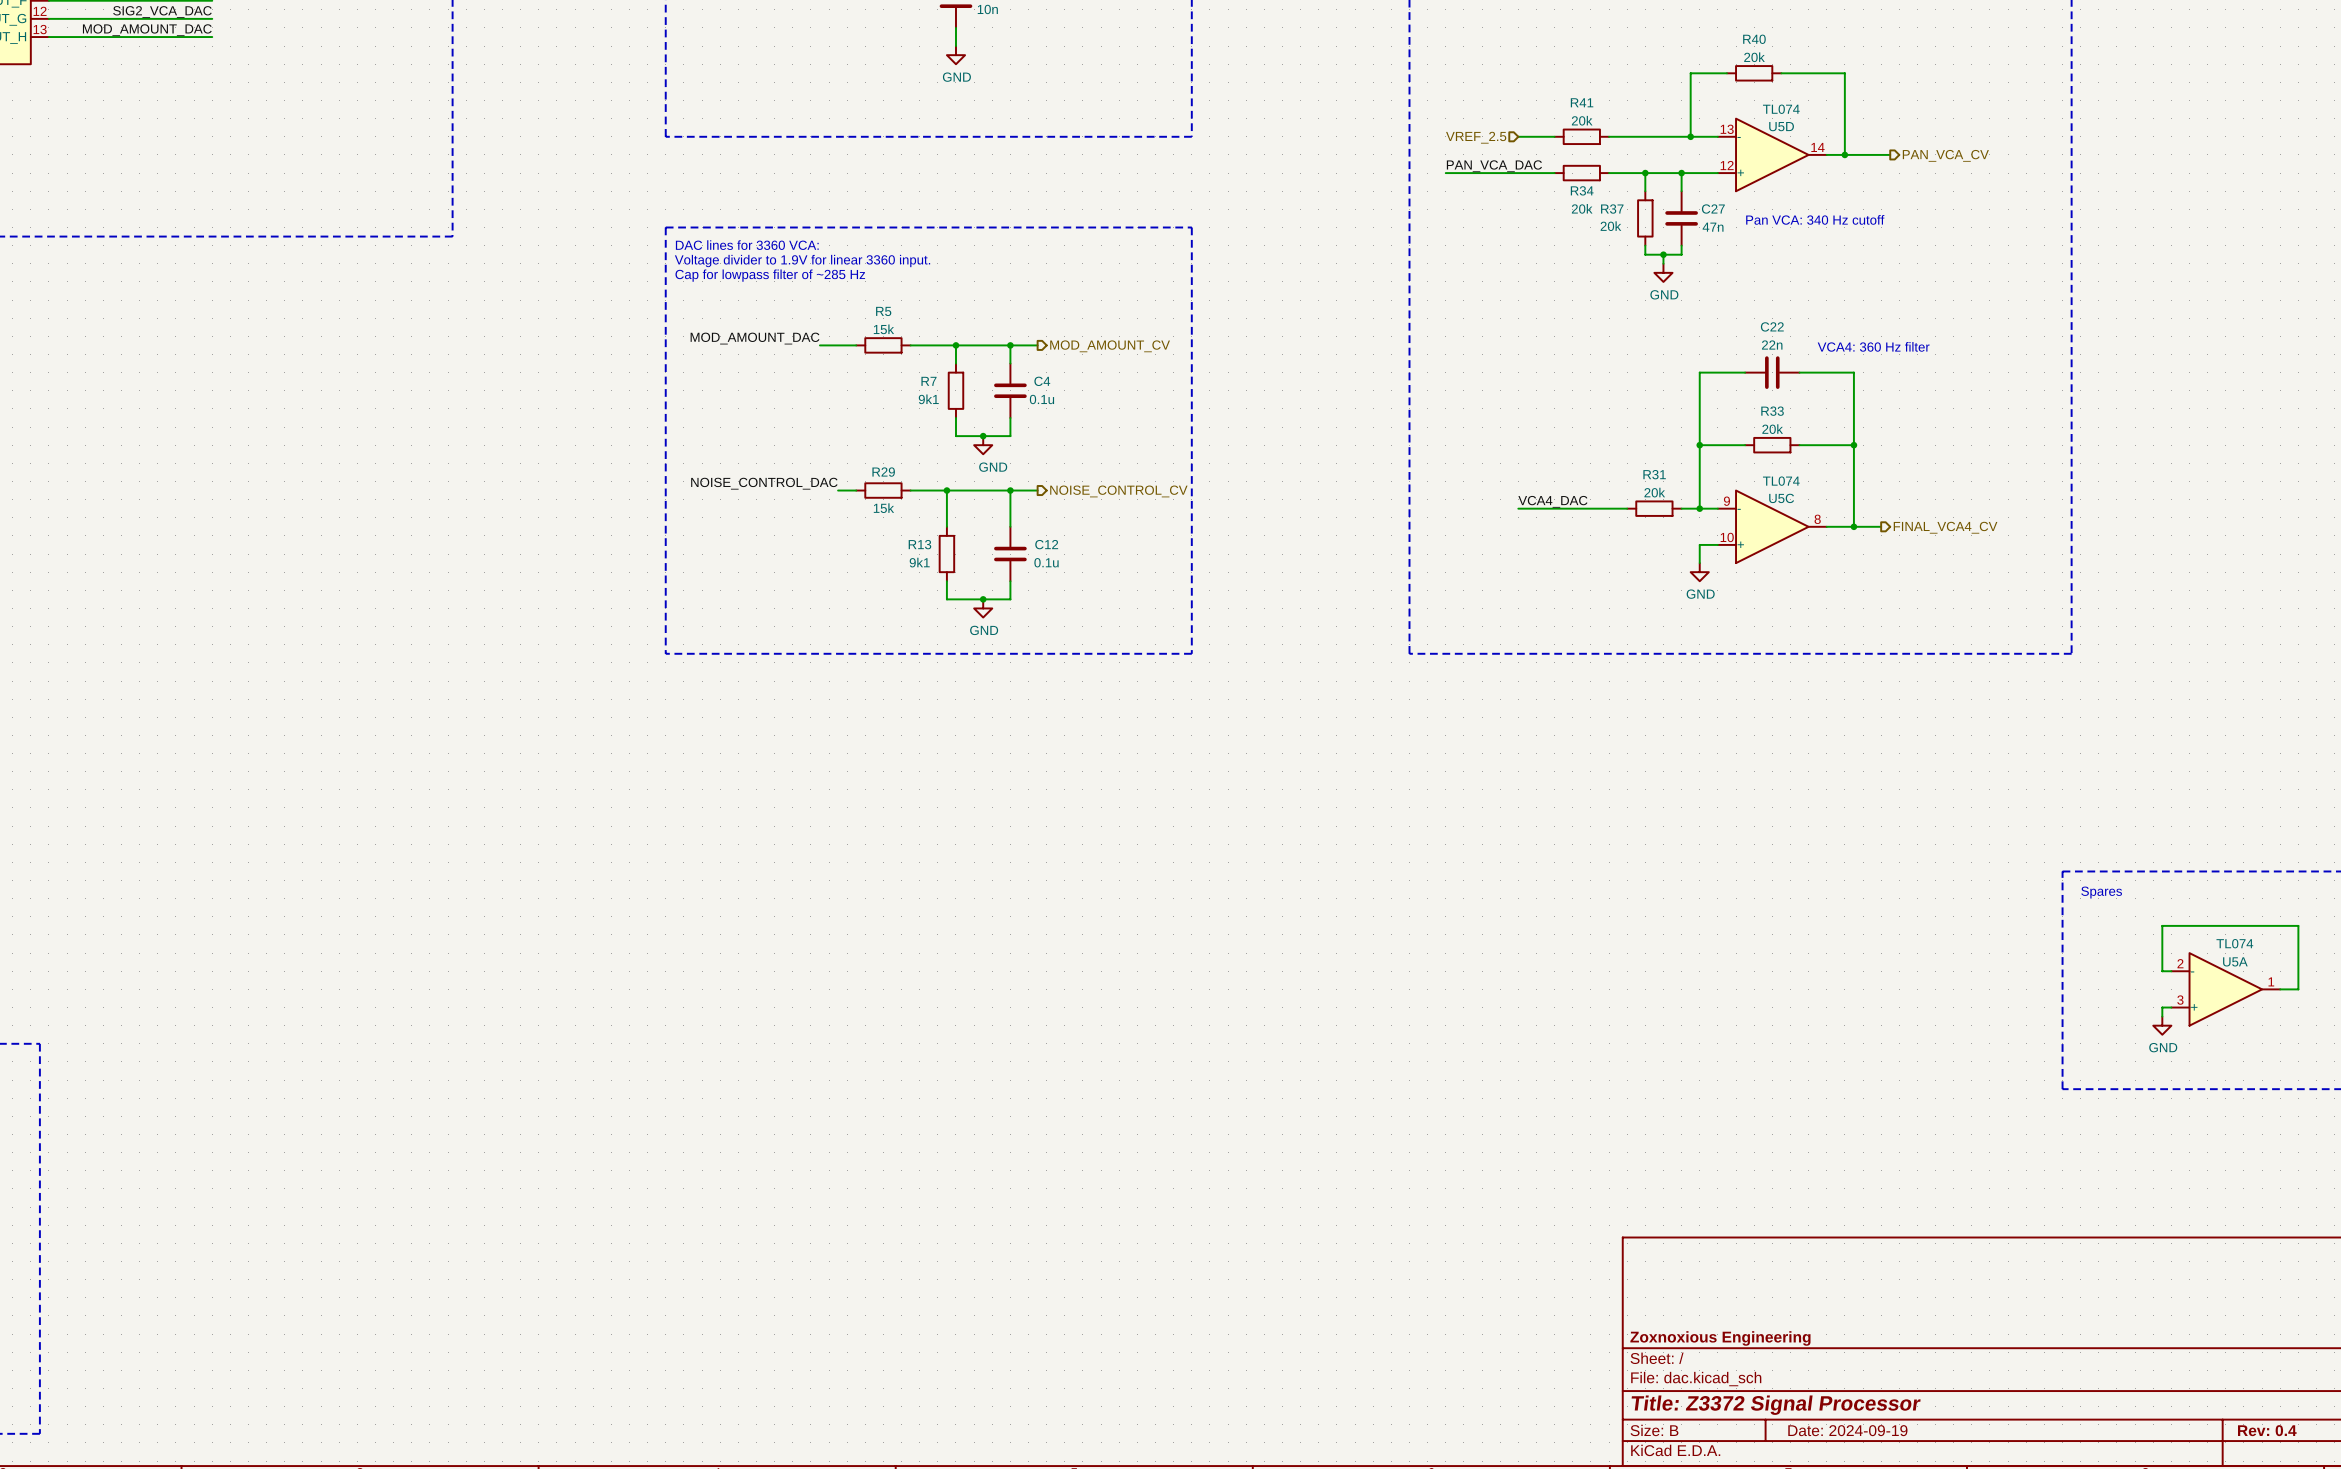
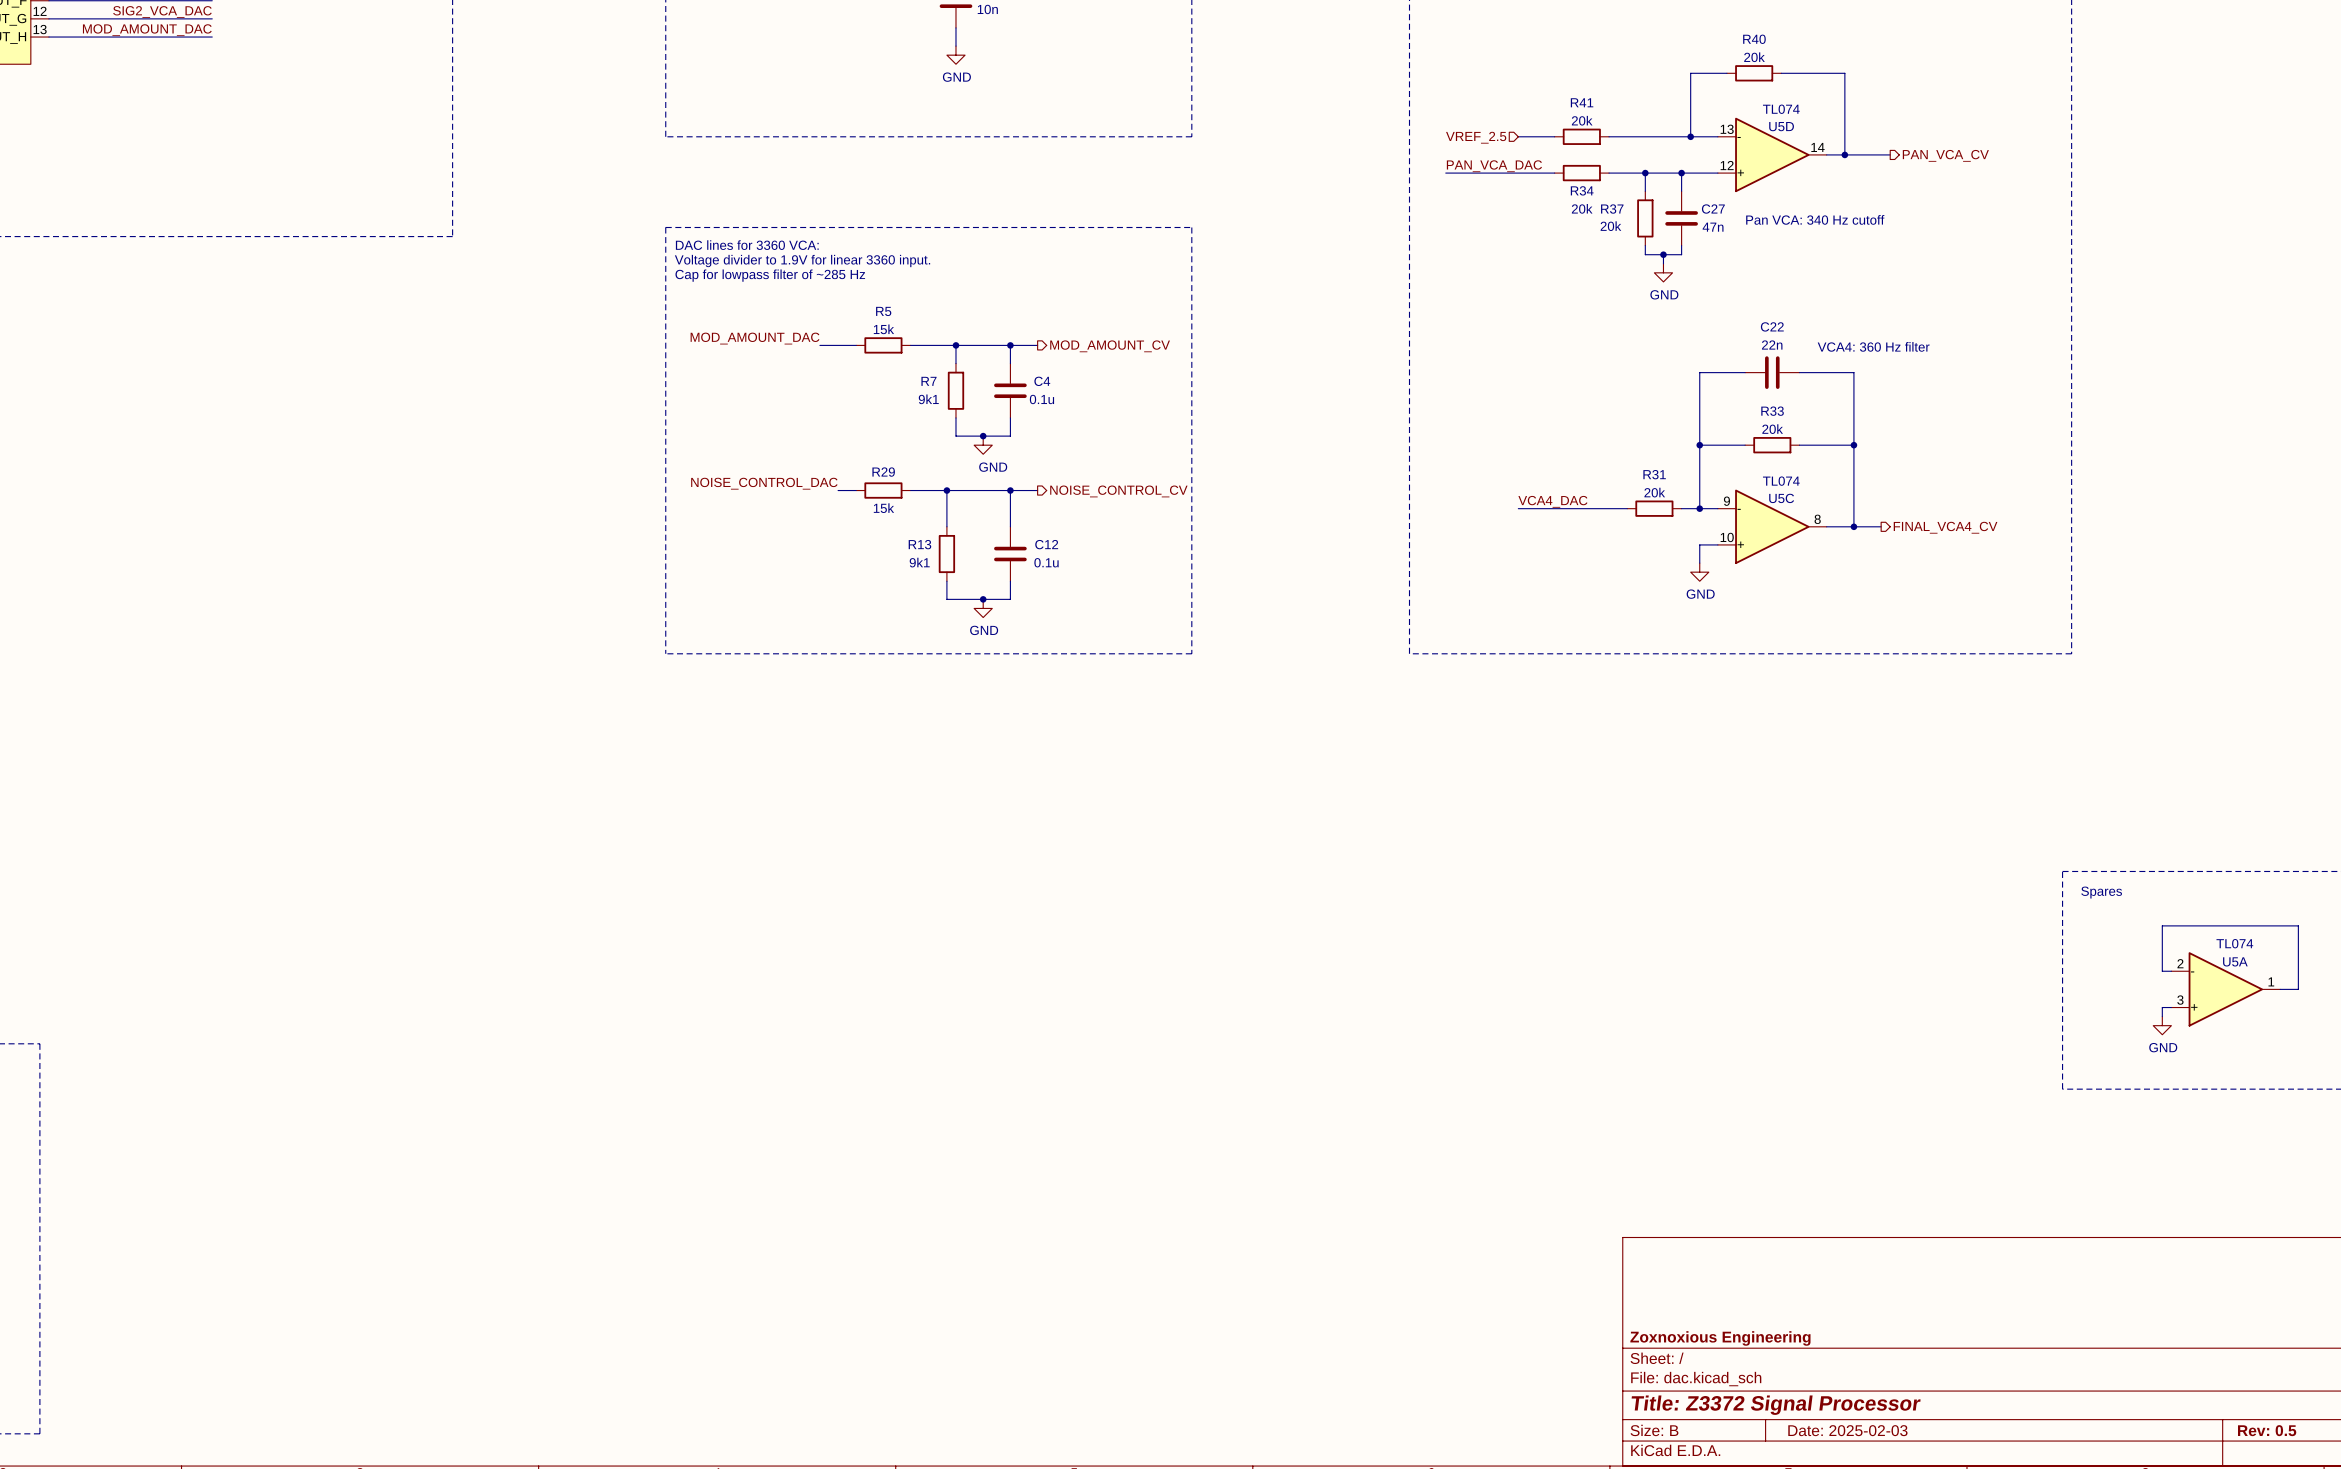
title block: Date: 2024-09-19 (1847, 1430) -> Date: 2025-02-03 (1847, 1430)
title block: Rev: 0.4 (2267, 1430) -> Rev: 0.5 (2267, 1430)

